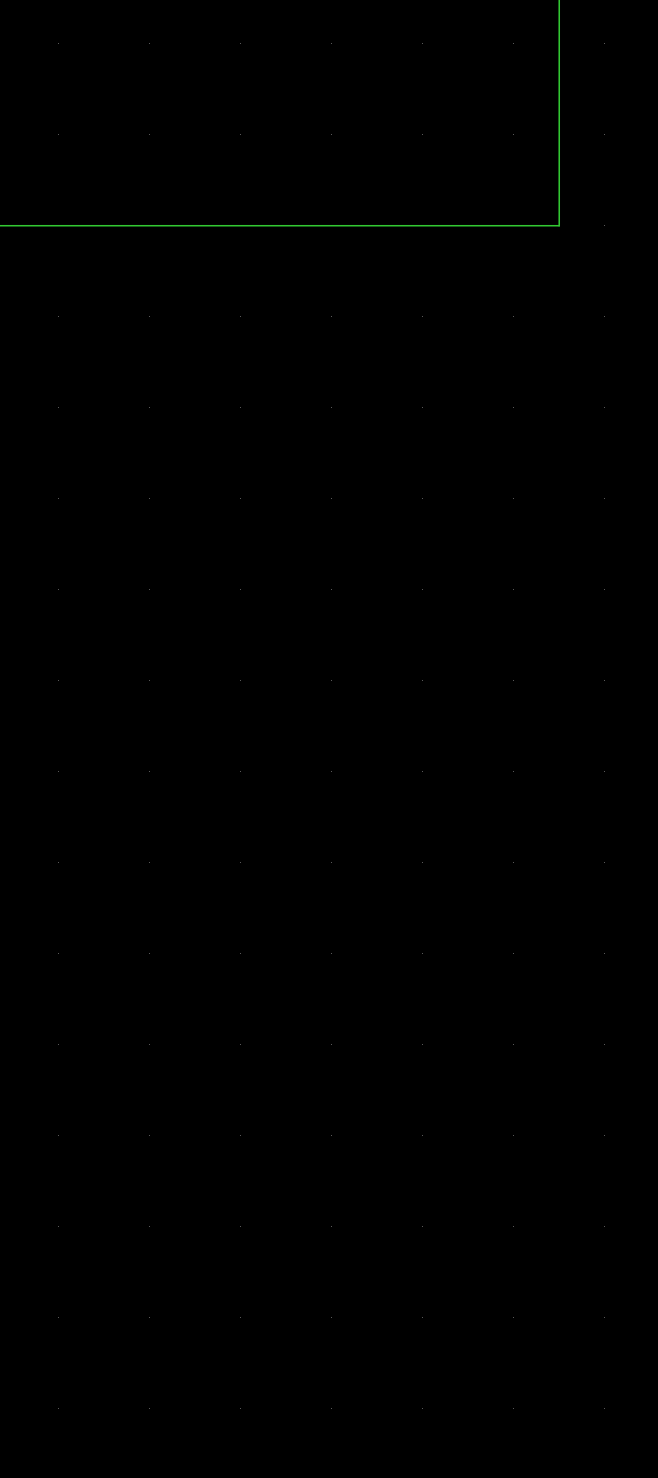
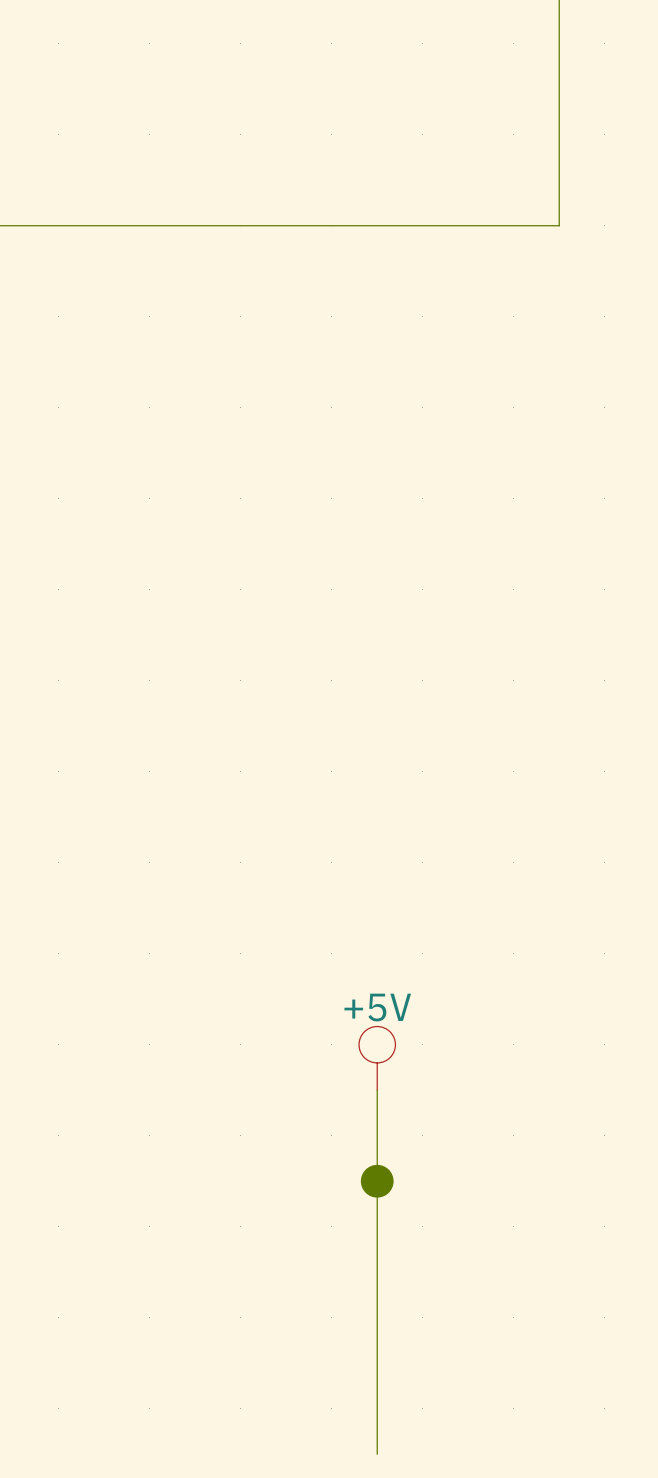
power symbol: none -> +5V (377, 1058)
wire: none -> (377, 1090) (377, 1454)
junction: none -> (377, 1181)

